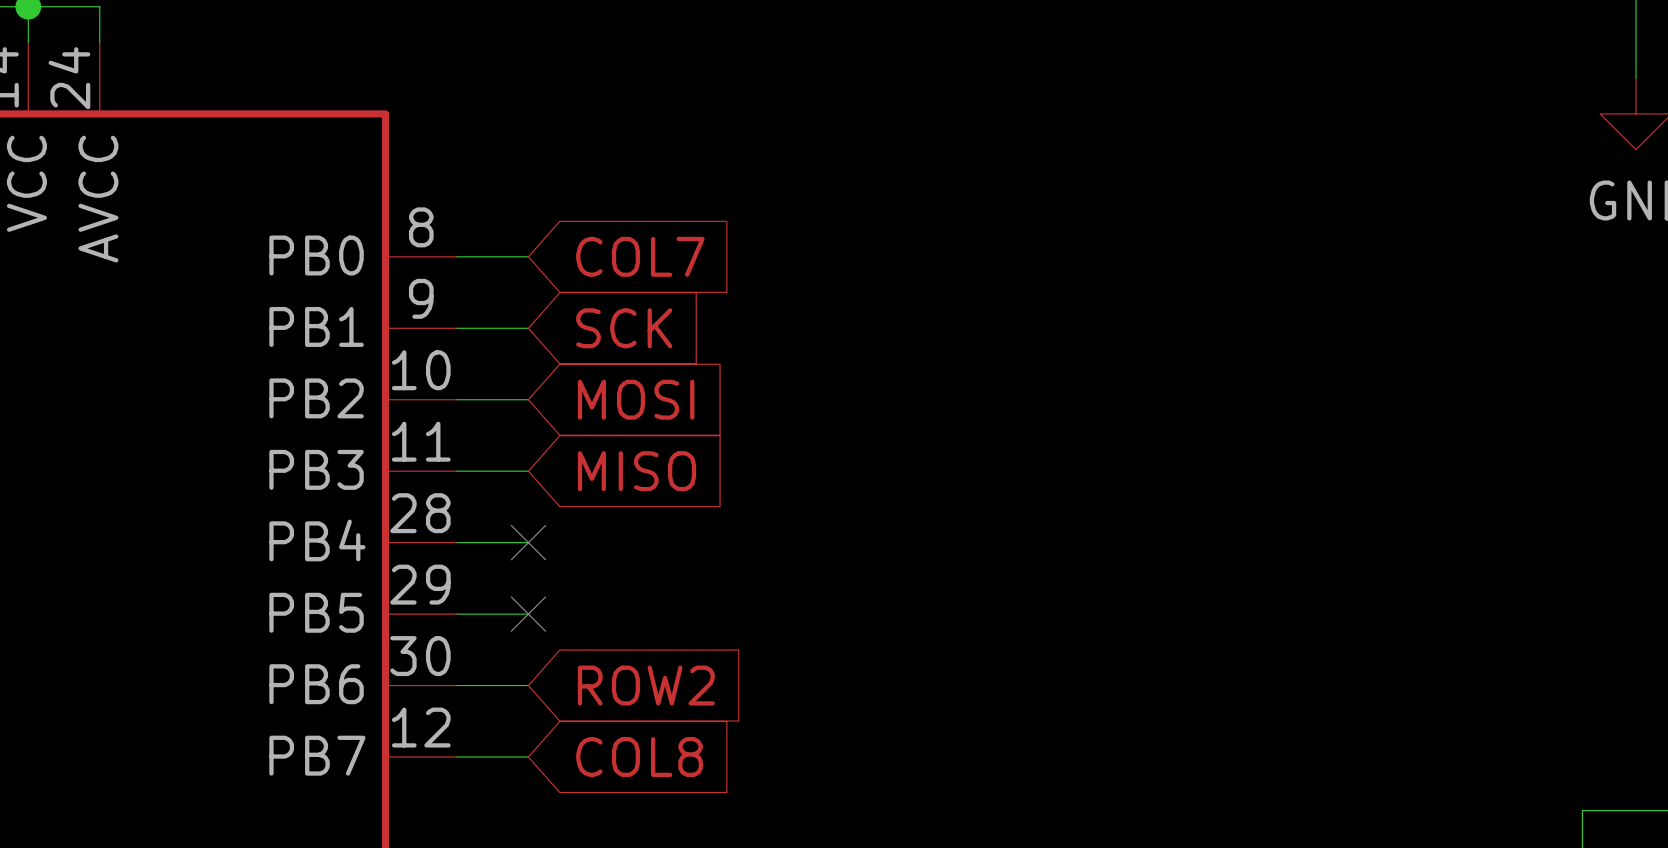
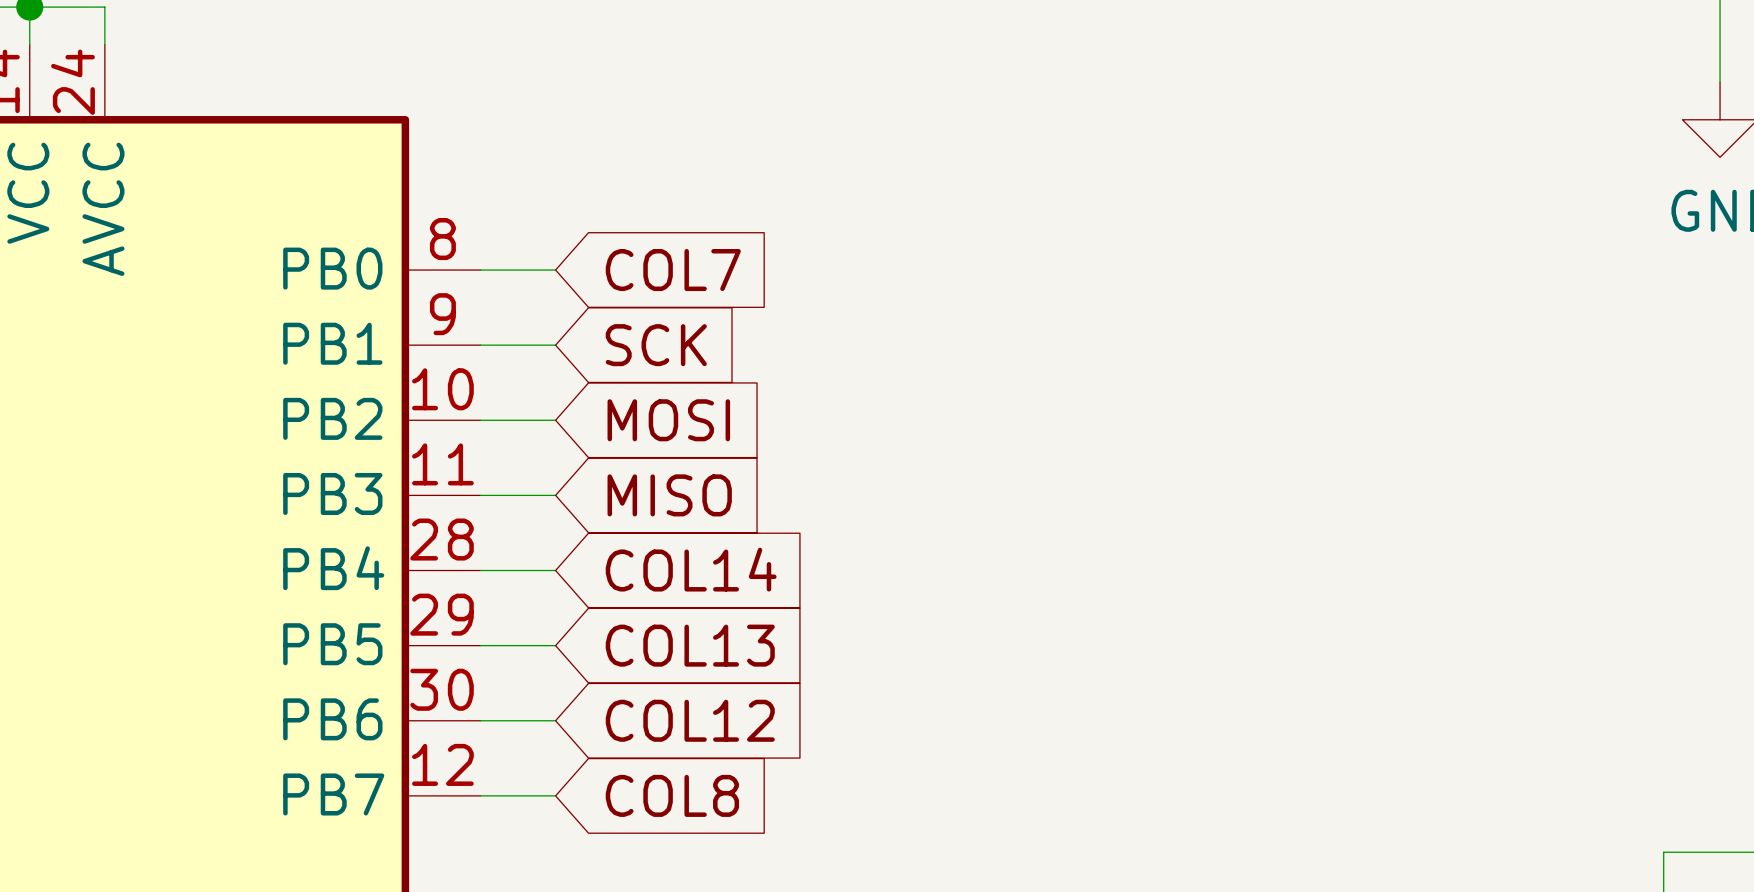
global label: none -> COL14 (691, 569)
no-connect mark: (528, 542) -> none
no-connect mark: (528, 614) -> none
global label: none -> COL13 (690, 645)
global label: ROW2 (646, 685) -> COL12 (690, 720)

